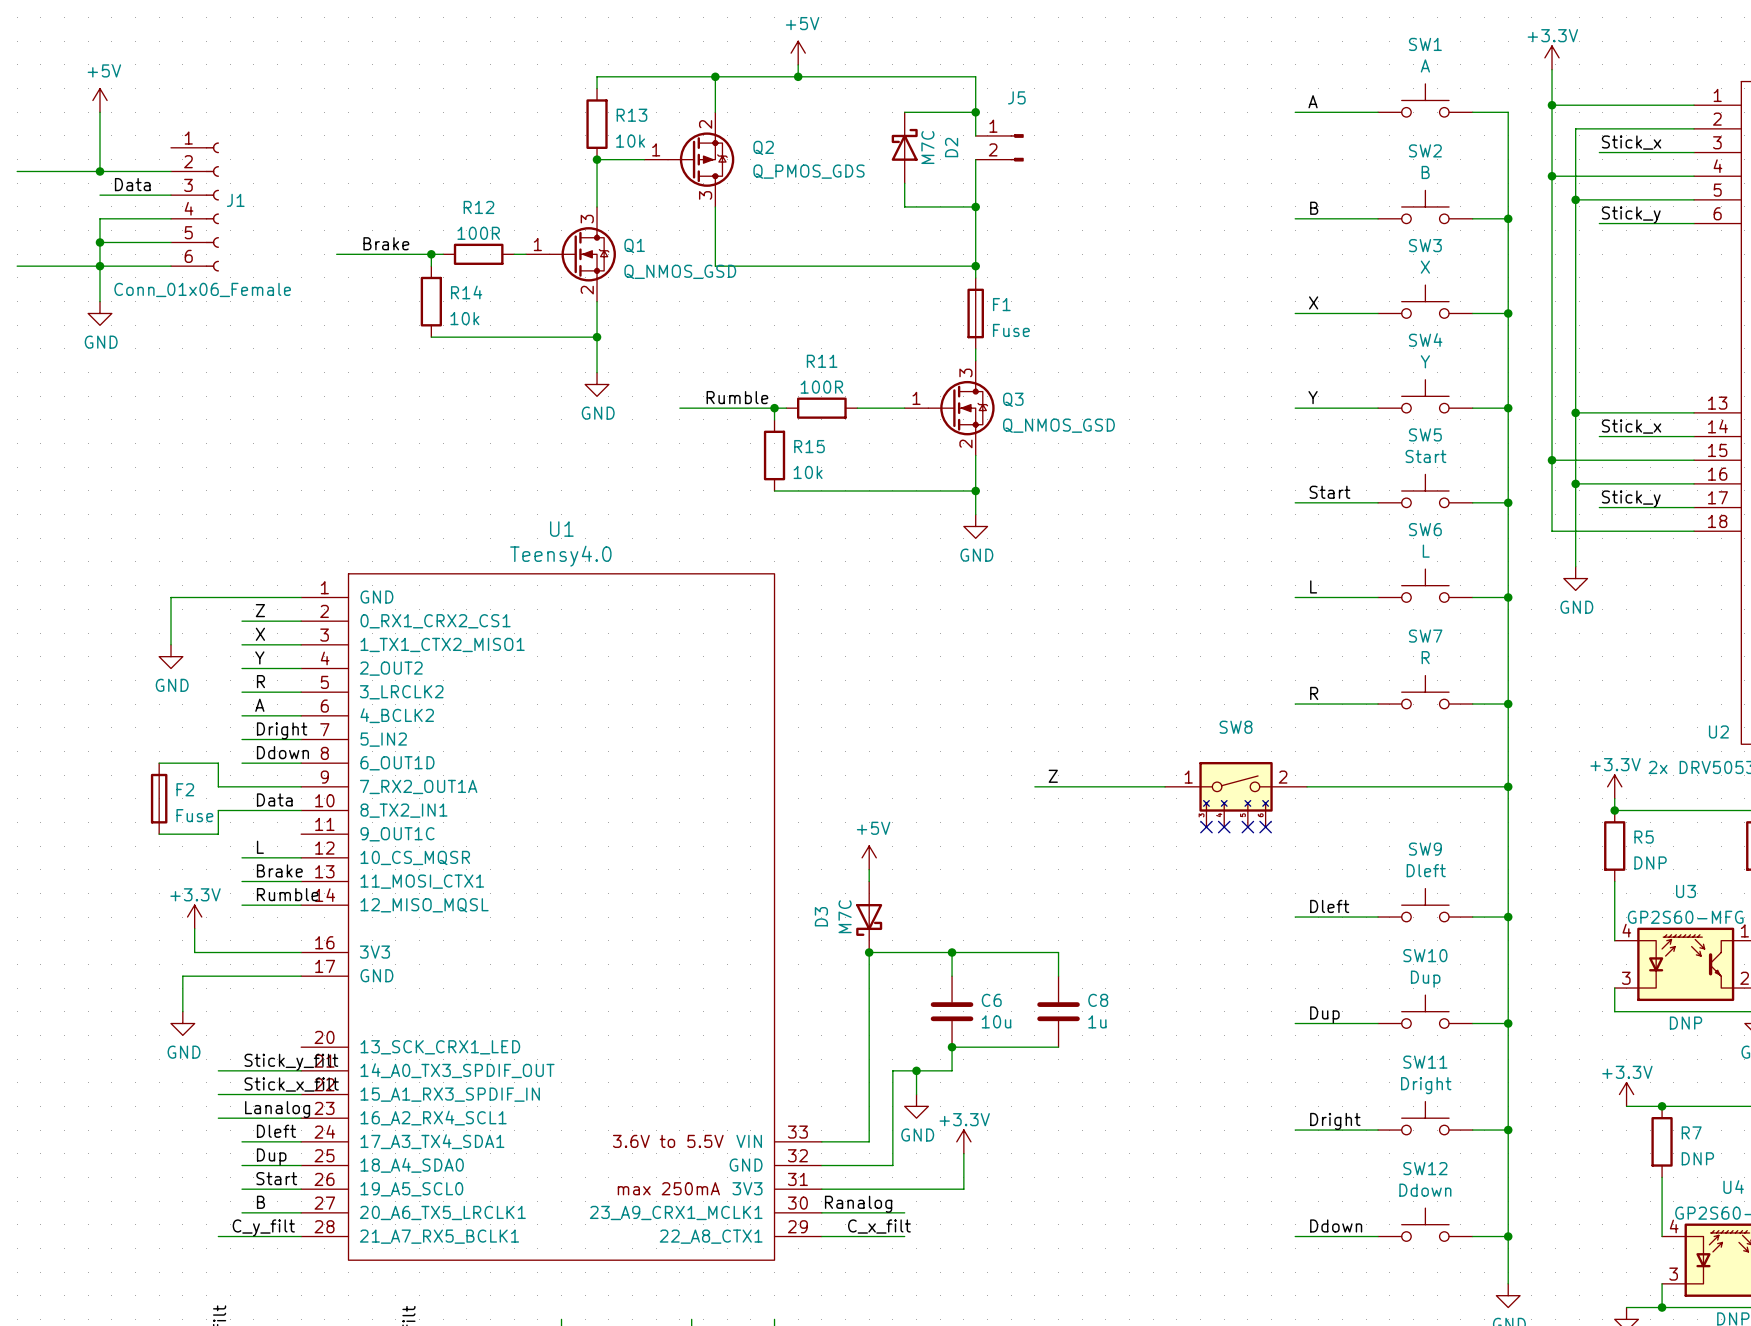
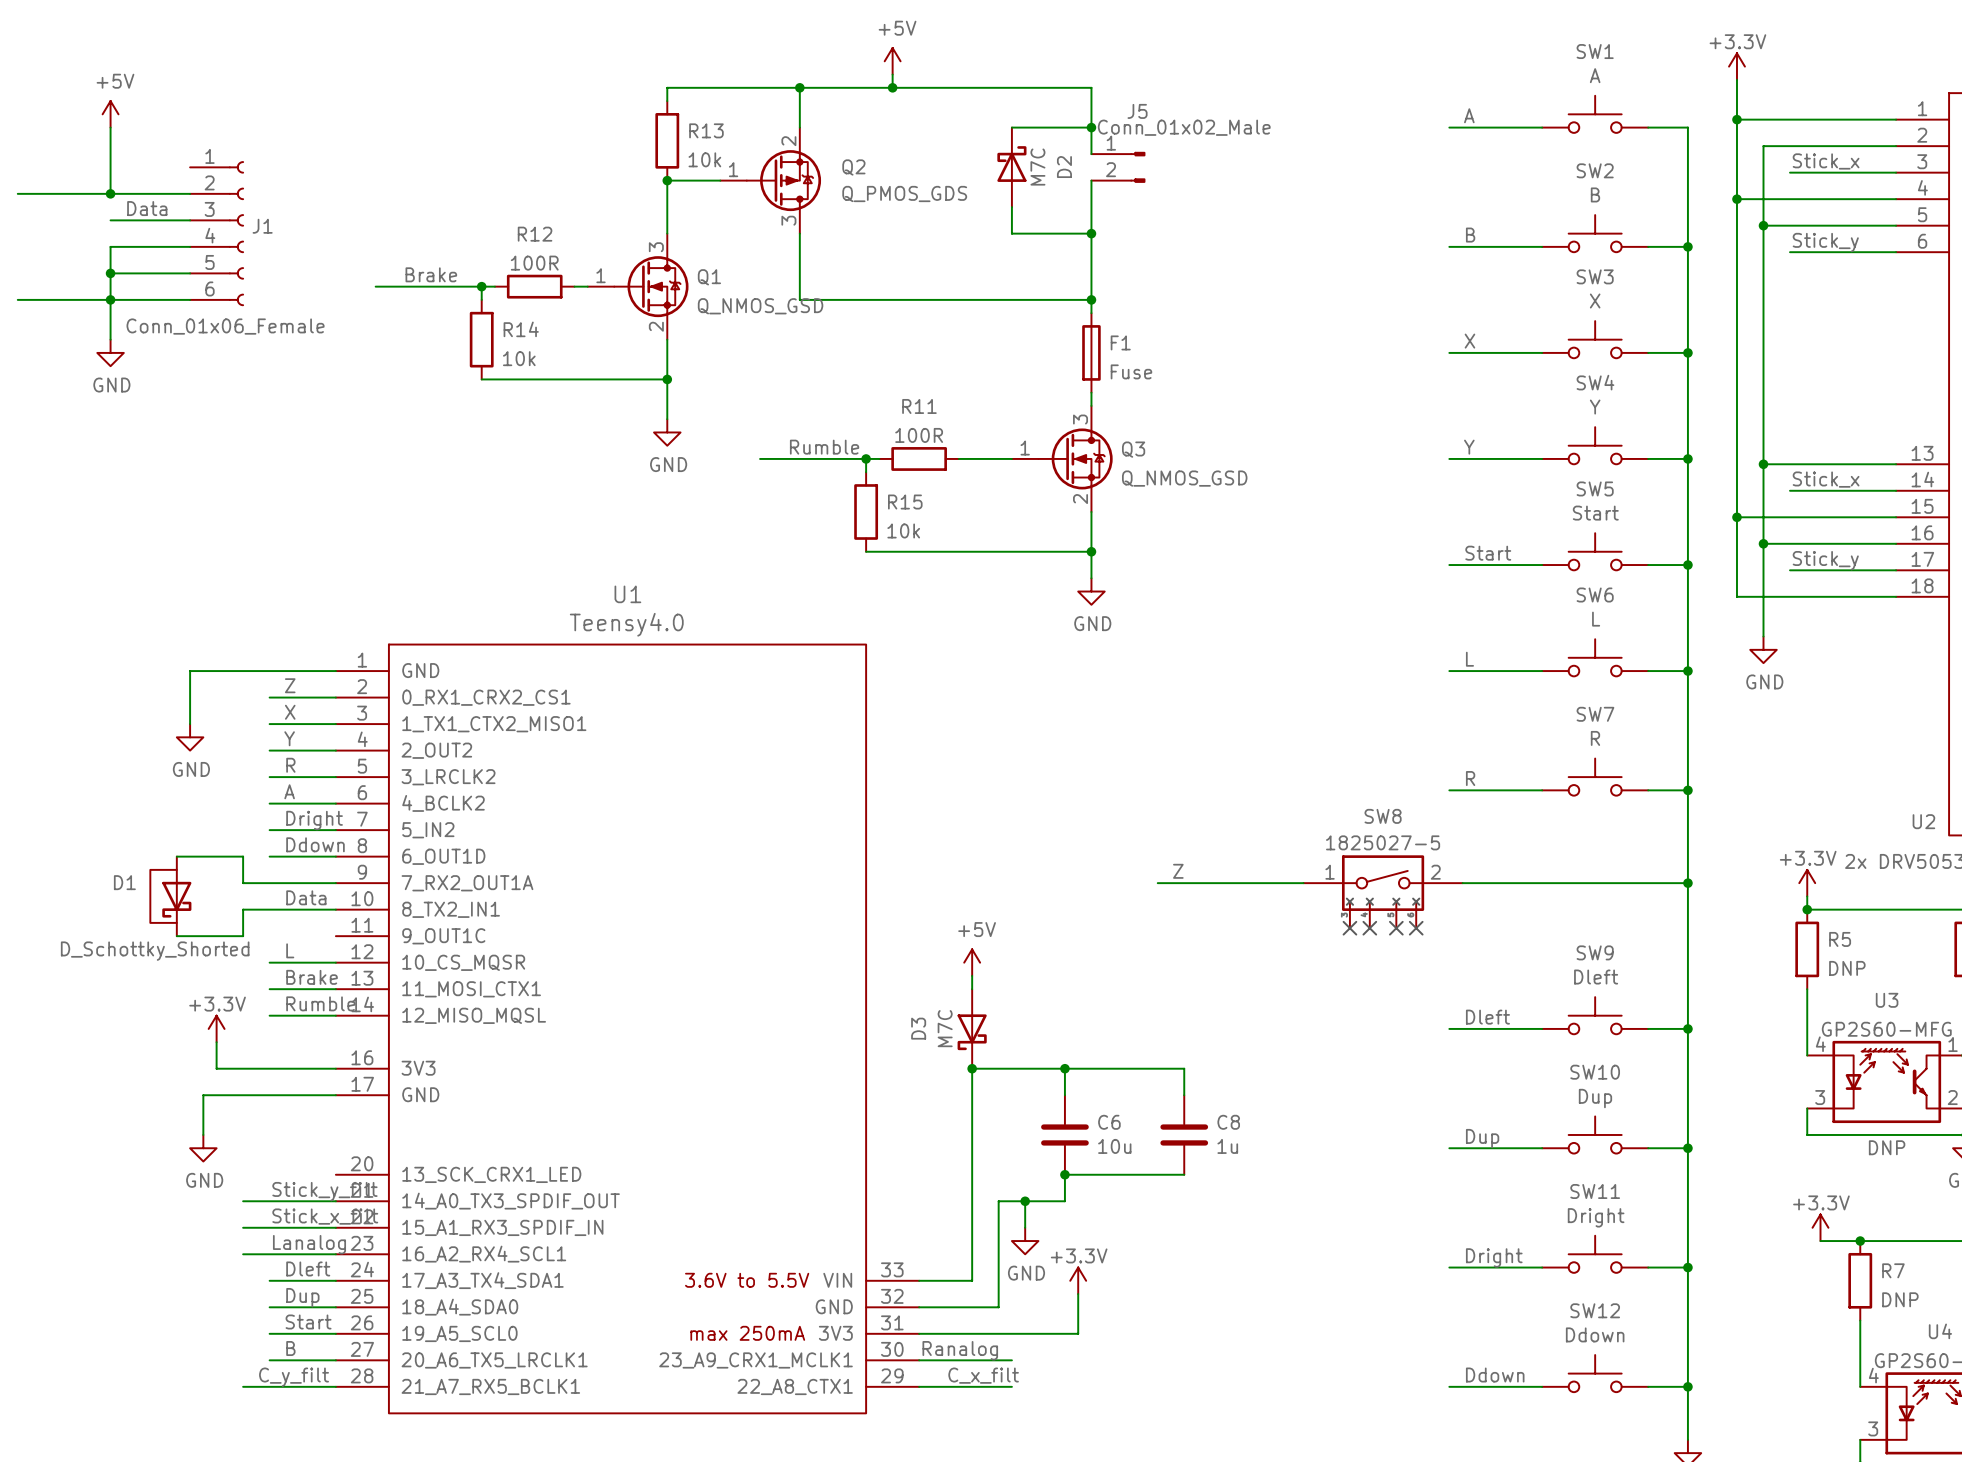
J5 value: none -> Conn_01x02_Male (1184, 127)
SW8 value: none -> 1825027-5 (1383, 842)
D1: none -> D_Schottky_Shorted (170, 896)
F2: Fuse (159, 798) -> none

